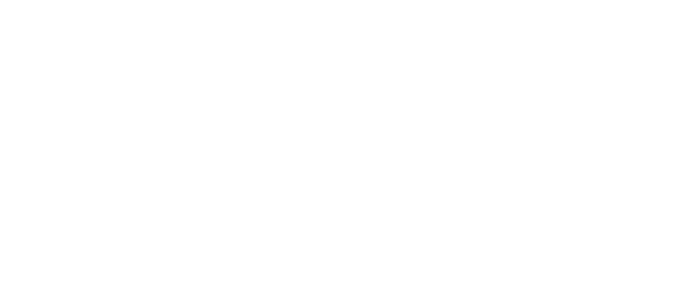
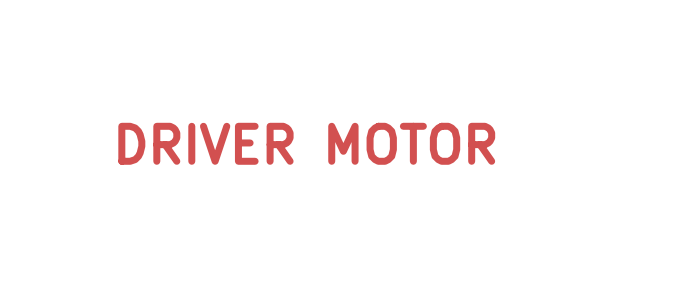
text: none -> DRIVER MOTOR (306, 143)

